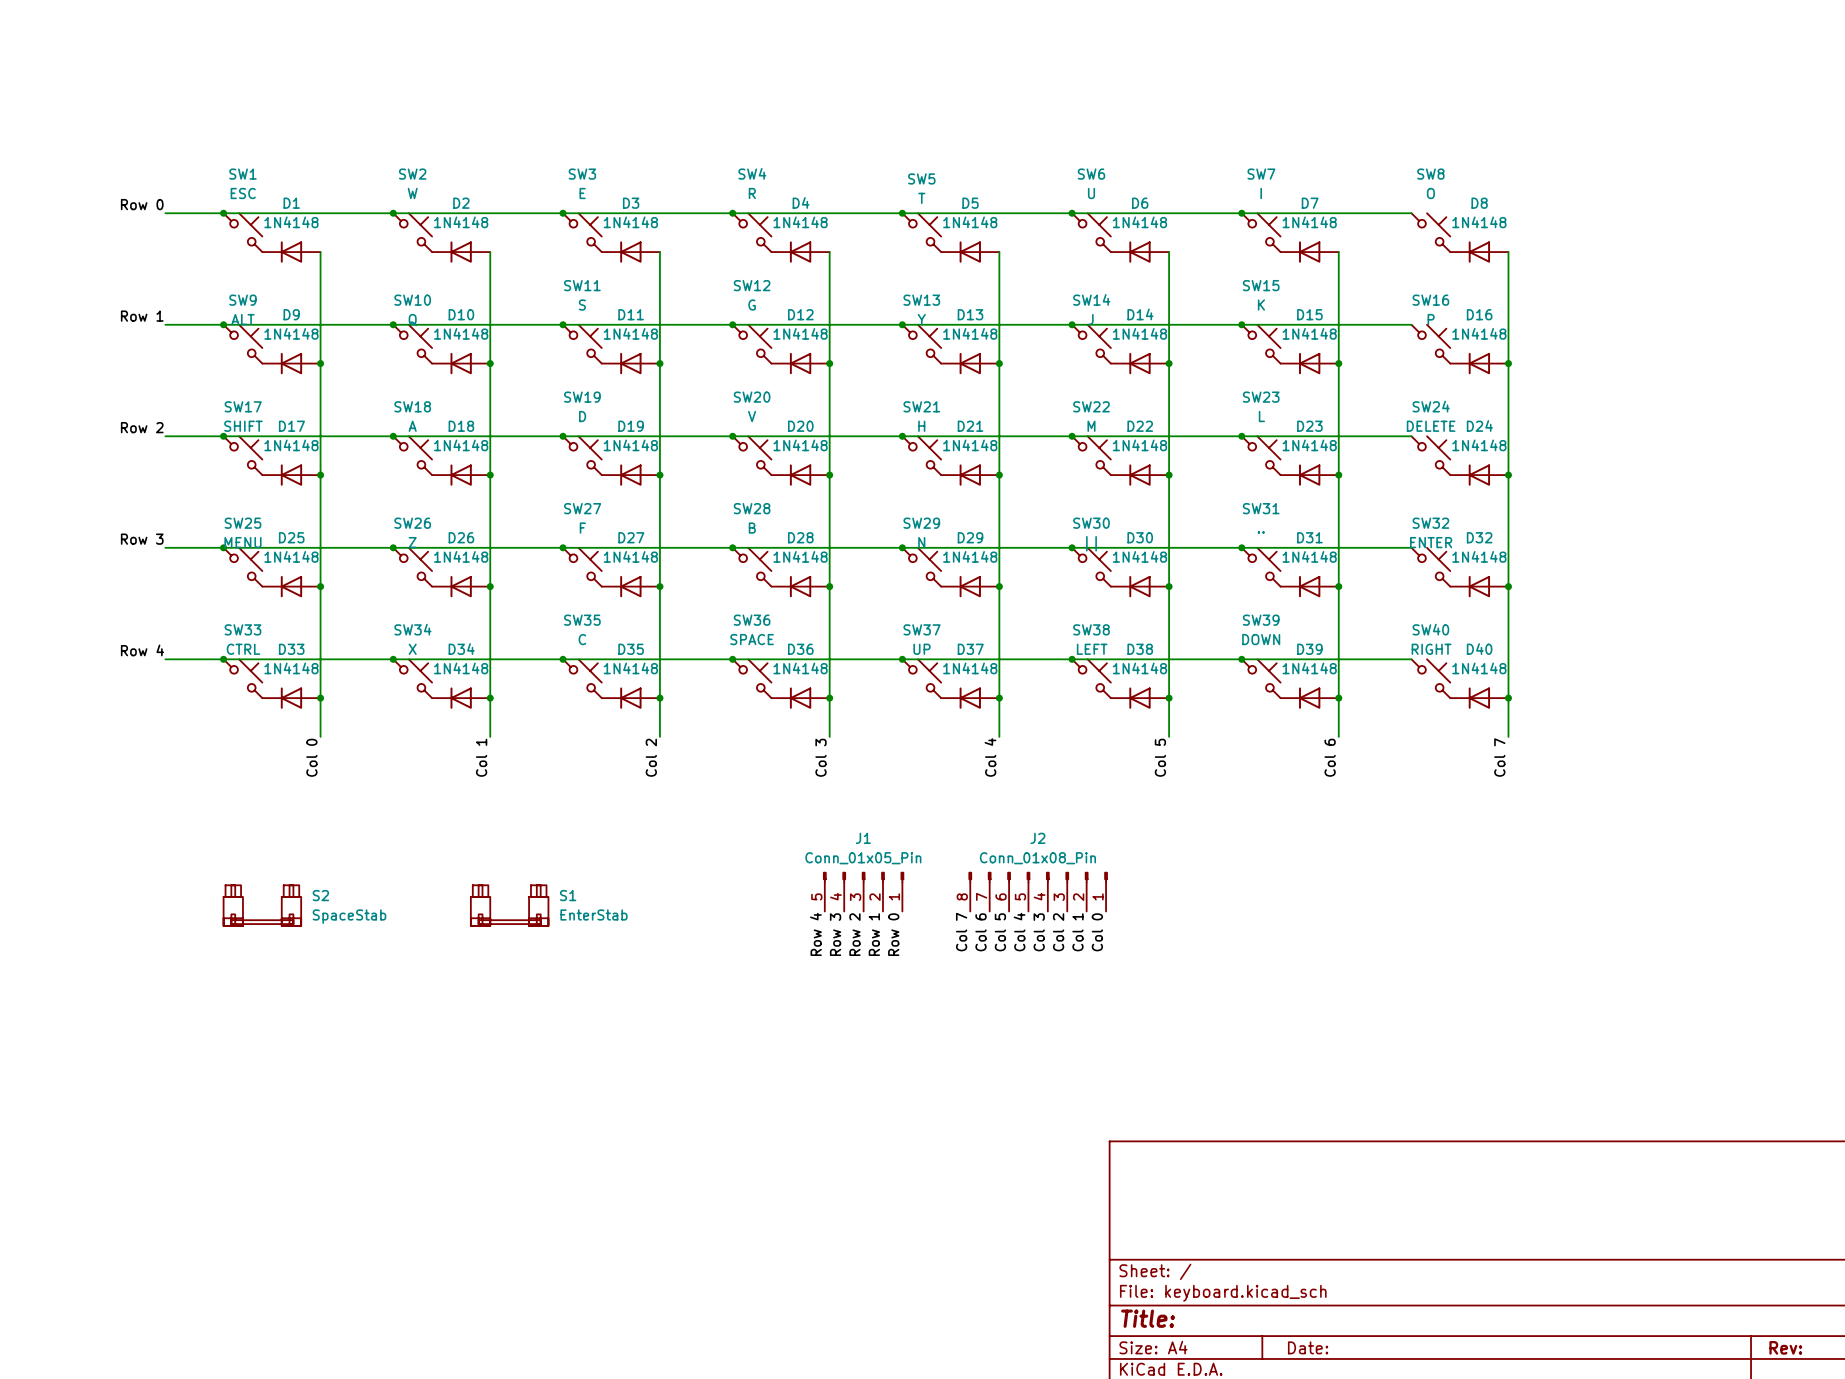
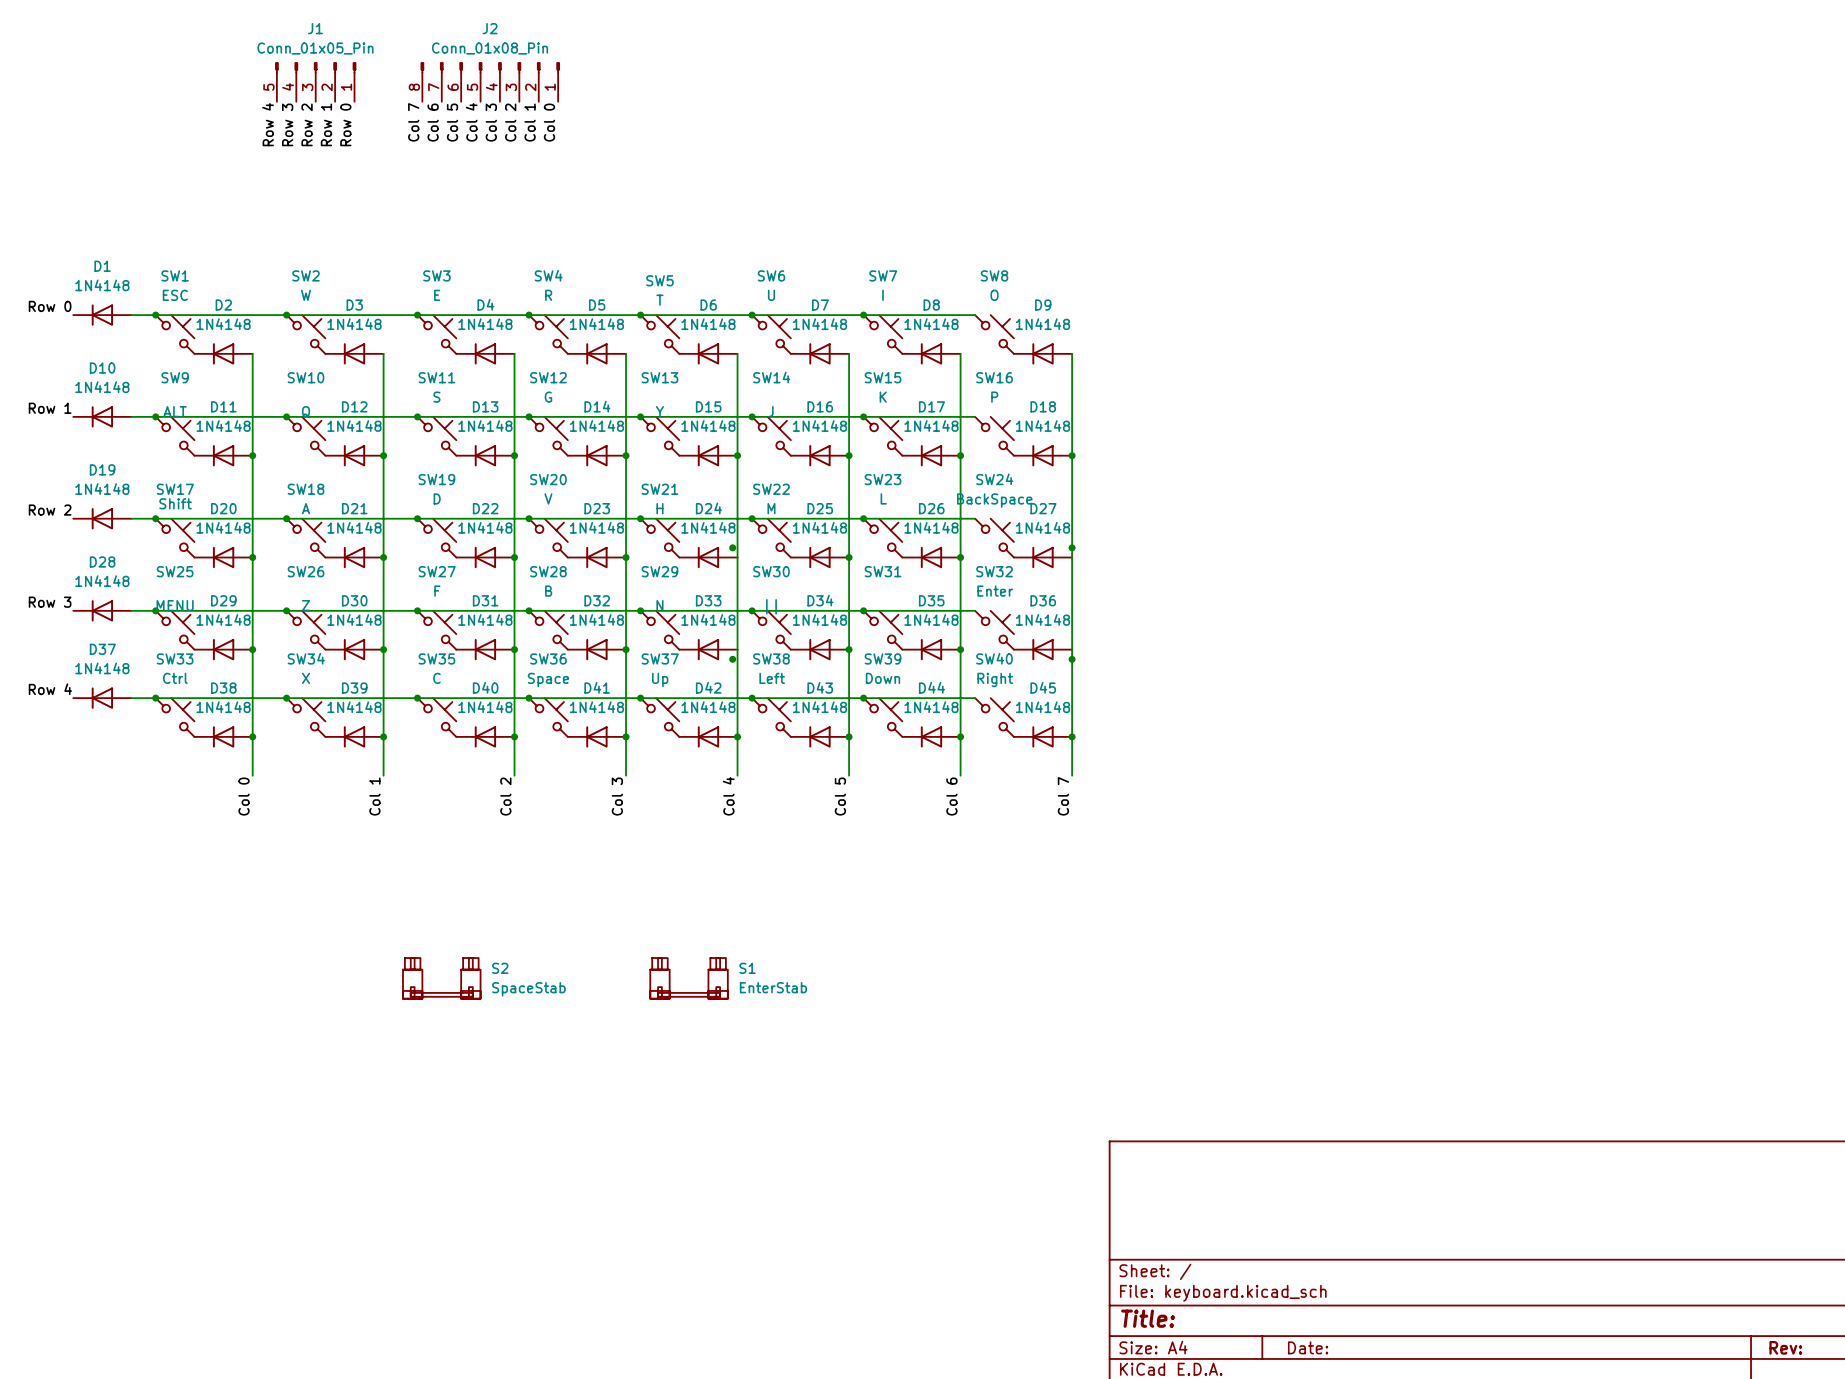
label: none -> Col 7 (413, 122)
label: none -> Col 6 (433, 122)
label: none -> Col 5 (452, 122)
label: none -> Col 4 (471, 122)
label: none -> Col 3 (491, 122)
label: none -> Col 2 (510, 122)
label: none -> Col 1 (530, 122)
label: none -> Col 0 (549, 122)
label: none -> Row 4 (268, 124)
label: none -> Row 3 (287, 124)
label: none -> Row 2 (307, 124)
label: none -> Row 1 (326, 124)
label: none -> Row 0 (345, 124)
label: Row 0 (142, 204) -> none
wire: (165, 213) (1411, 213) -> none
junction: (223, 213) -> none
junction: (393, 213) -> none
junction: (562, 213) -> none
junction: (732, 213) -> none
junction: (902, 213) -> none
junction: (1072, 213) -> none
junction: (1241, 213) -> none
SW1 position: (242, 232) -> (175, 334)
SW2 position: (412, 232) -> (306, 334)
SW3 position: (582, 232) -> (436, 334)
SW4 position: (752, 232) -> (548, 334)
SW5 position: (921, 232) -> (659, 334)
SW6 position: (1091, 232) -> (771, 334)
SW7 position: (1261, 232) -> (883, 334)
SW8 position: (1430, 232) -> (994, 334)
D1 position: (291, 252) -> (102, 315)
wire: (320, 252) (320, 736) -> none
D2 position: (461, 252) -> (223, 353)
wire: (490, 252) (490, 736) -> none
D3 position: (630, 252) -> (354, 353)
wire: (659, 252) (659, 736) -> none
D4 position: (800, 252) -> (485, 353)
wire: (829, 252) (829, 736) -> none
D5 position: (970, 252) -> (596, 353)
wire: (999, 252) (999, 736) -> none
D6 position: (1139, 252) -> (708, 353)
wire: (1169, 252) (1169, 736) -> none
D7 position: (1309, 252) -> (819, 353)
wire: (1338, 252) (1338, 736) -> none
D8 position: (1479, 252) -> (931, 353)
wire: (1508, 252) (1508, 736) -> none
SW14 name position: SW14 (1091, 299) -> SW14 (771, 377)
SW9 name position: SW9 (242, 300) -> SW9 (175, 377)
SW10 name position: SW10 (412, 300) -> SW10 (306, 377)
SW13 name position: SW13 (921, 300) -> SW13 (659, 377)
SW16 name position: SW16 (1430, 300) -> SW16 (994, 377)
label: none -> Row 0 (50, 306)
wire: none -> (131, 315) (975, 315)
junction: none -> (155, 315)
junction: none -> (286, 315)
junction: none -> (529, 315)
junction: none -> (640, 315)
junction: none -> (863, 315)
label position: Row 1 (142, 316) -> Row 1 (50, 408)
SW16 value position: P (1431, 319) -> P (994, 397)
wire: (165, 324) (1411, 324) -> none
junction: (223, 324) -> none
junction position: (393, 324) -> (417, 315)
junction: (562, 324) -> none
junction position: (732, 324) -> (752, 315)
junction: (902, 324) -> none
junction: (1072, 324) -> none
junction: (1241, 324) -> none
SW9 position: (242, 344) -> (175, 436)
SW10 position: (412, 344) -> (306, 436)
SW11 position: (582, 344) -> (436, 436)
SW12 position: (752, 344) -> (548, 436)
SW13 position: (921, 344) -> (659, 436)
SW14 position: (1091, 344) -> (771, 436)
SW15 position: (1261, 344) -> (883, 436)
SW16 position: (1430, 344) -> (994, 436)
wire: none -> (252, 353) (252, 775)
wire: none -> (383, 353) (383, 775)
wire: none -> (514, 353) (514, 775)
wire: none -> (626, 353) (626, 775)
wire: none -> (737, 353) (737, 775)
wire: none -> (849, 353) (849, 775)
wire: none -> (960, 353) (960, 775)
wire: none -> (1072, 353) (1072, 775)
D9 position: (291, 363) -> (1043, 353)
junction: (320, 363) -> none
D10 position: (461, 363) -> (102, 416)
junction: (490, 363) -> none
D11 position: (630, 363) -> (223, 455)
junction: (659, 363) -> none
D12 position: (800, 363) -> (354, 455)
junction: (829, 363) -> none
D13 position: (970, 363) -> (485, 455)
junction: (999, 363) -> none
D14 position: (1139, 363) -> (596, 455)
junction: (1169, 363) -> none
D15 position: (1309, 363) -> (708, 455)
junction: (1338, 363) -> none
D16 position: (1479, 363) -> (819, 455)
junction: (1508, 363) -> none
SW24 name position: SW24 (1431, 406) -> SW24 (994, 479)
wire: none -> (131, 416) (975, 416)
junction: none -> (155, 416)
junction: none -> (286, 416)
junction: none -> (417, 416)
junction: none -> (529, 416)
junction: none -> (640, 416)
junction: none -> (752, 416)
junction: none -> (863, 416)
SW17 value: SHIFT (243, 426) -> Shift (175, 503)
SW24 value: DELETE (1431, 426) -> BackSpace (994, 500)
label position: Row 2 (142, 427) -> Row 2 (50, 510)
wire: (165, 436) (1411, 436) -> none
junction: (223, 436) -> none
junction: (393, 436) -> none
junction: (562, 436) -> none
junction: (732, 436) -> none
junction: (902, 436) -> none
junction position: (1072, 436) -> (1072, 455)
junction: (1241, 436) -> none
SW17 position: (242, 455) -> (175, 538)
junction: none -> (252, 455)
junction: none -> (383, 455)
SW18 position: (412, 455) -> (306, 538)
junction: none -> (514, 455)
SW19 position: (582, 455) -> (436, 538)
junction: none -> (626, 455)
junction: none -> (737, 455)
SW20 position: (752, 455) -> (548, 538)
SW21 position: (921, 455) -> (659, 538)
junction: none -> (960, 455)
SW22 position: (1091, 455) -> (771, 538)
SW23 position: (1261, 455) -> (883, 538)
SW24 position: (1430, 455) -> (994, 538)
D17 position: (291, 475) -> (931, 455)
junction: (320, 475) -> none
D18 position: (461, 475) -> (1043, 455)
junction: (490, 475) -> none
D19 position: (630, 475) -> (102, 518)
junction: (659, 475) -> none
D20 position: (800, 475) -> (223, 557)
junction position: (829, 475) -> (849, 455)
D21 position: (970, 475) -> (354, 557)
junction: (999, 475) -> none
D22 position: (1139, 475) -> (485, 557)
junction: (1169, 475) -> none
D23 position: (1309, 475) -> (596, 557)
junction: (1338, 475) -> none
D24 position: (1479, 475) -> (708, 557)
junction: (1508, 475) -> none
wire: none -> (131, 518) (975, 518)
junction: none -> (155, 518)
junction: none -> (286, 518)
junction: none -> (417, 518)
junction: none -> (529, 518)
junction: none -> (640, 518)
junction: none -> (752, 518)
junction: none -> (863, 518)
SW25 name position: SW25 (242, 523) -> SW25 (175, 571)
SW26 name position: SW26 (412, 523) -> SW26 (306, 571)
SW29 name position: SW29 (921, 523) -> SW29 (659, 571)
SW30 name position: SW30 (1091, 523) -> SW30 (771, 571)
SW32 name position: SW32 (1430, 523) -> SW32 (994, 571)
SW31 value: .. (1261, 532) -> none
label position: Row 3 (142, 539) -> Row 3 (50, 602)
SW32 value: ENTER (1431, 542) -> Enter (995, 591)
wire: (165, 547) (1411, 547) -> none
junction position: (223, 547) -> (252, 557)
junction position: (393, 547) -> (383, 557)
junction: (562, 547) -> none
junction: (902, 547) -> none
junction: (1241, 547) -> none
junction: none -> (514, 557)
junction: none -> (626, 557)
junction: none -> (849, 557)
junction: none -> (960, 557)
SW25 position: (242, 567) -> (175, 630)
SW26 position: (412, 567) -> (306, 630)
SW27 position: (582, 567) -> (436, 630)
SW28 position: (752, 567) -> (548, 630)
SW29 position: (921, 567) -> (659, 630)
SW30 position: (1091, 567) -> (771, 630)
SW31 position: (1261, 567) -> (883, 630)
SW32 position: (1430, 567) -> (994, 630)
D25 position: (291, 586) -> (819, 557)
junction: (320, 586) -> none
D26 position: (461, 586) -> (931, 557)
junction: (490, 586) -> none
D27 position: (630, 586) -> (1043, 557)
junction: (659, 586) -> none
D28 position: (800, 586) -> (102, 610)
junction: (829, 586) -> none
D29 position: (970, 586) -> (223, 649)
junction: (999, 586) -> none
D30 position: (1139, 586) -> (354, 649)
junction: (1169, 586) -> none
D31 position: (1309, 586) -> (485, 649)
junction: (1338, 586) -> none
D32 position: (1479, 586) -> (596, 649)
junction: (1508, 586) -> none
wire: none -> (131, 610) (975, 610)
junction: none -> (155, 610)
junction: none -> (286, 610)
junction: none -> (417, 610)
junction: none -> (529, 610)
junction: none -> (640, 610)
junction: none -> (752, 610)
junction: none -> (863, 610)
SW33 name position: SW33 (242, 629) -> SW33 (175, 658)
SW34 name position: SW34 (412, 629) -> SW34 (306, 658)
SW37 name position: SW37 (922, 629) -> SW37 (660, 658)
SW38 name position: SW38 (1091, 629) -> SW38 (771, 658)
SW40 name position: SW40 (1430, 629) -> SW40 (994, 658)
SW36 value: SPACE (752, 639) -> Space (548, 679)
SW39 value: DOWN (1261, 639) -> Down (883, 678)
SW33 value: CTRL (243, 649) -> Ctrl (175, 678)
SW34 value position: X (412, 649) -> X (306, 678)
junction: none -> (514, 649)
junction: none -> (626, 649)
junction: none -> (849, 649)
SW37 value: UP (922, 649) -> Up (660, 679)
junction: none -> (960, 649)
SW38 value: LEFT (1092, 649) -> Left (772, 678)
SW40 value: RIGHT (1431, 649) -> Right (995, 679)
label position: Row 4 (142, 650) -> Row 4 (50, 689)
wire: (165, 659) (1411, 659) -> none
junction position: (223, 659) -> (252, 649)
junction position: (393, 659) -> (383, 649)
junction: (562, 659) -> none
junction: (902, 659) -> none
junction: (1241, 659) -> none
SW33 position: (242, 678) -> (175, 717)
SW34 position: (412, 678) -> (306, 717)
SW35 position: (582, 678) -> (436, 717)
SW36 position: (752, 678) -> (548, 717)
SW37 position: (921, 678) -> (659, 717)
SW38 position: (1091, 678) -> (771, 717)
SW39 position: (1261, 678) -> (883, 717)
SW40 position: (1430, 678) -> (994, 717)
wire: none -> (131, 698) (975, 698)
junction: none -> (155, 698)
D33 position: (291, 698) -> (708, 649)
junction position: (320, 698) -> (286, 698)
junction: none -> (417, 698)
D34 position: (461, 698) -> (819, 649)
junction: (490, 698) -> none
junction: none -> (529, 698)
D35 position: (630, 698) -> (931, 649)
junction position: (659, 698) -> (640, 698)
junction: none -> (752, 698)
D36 position: (800, 698) -> (1043, 649)
junction: (829, 698) -> none
junction: none -> (863, 698)
D37 position: (970, 698) -> (102, 698)
junction: (999, 698) -> none
D38 position: (1139, 698) -> (223, 736)
junction: (1169, 698) -> none
D39 position: (1309, 698) -> (354, 736)
junction: (1338, 698) -> none
D40 position: (1479, 698) -> (485, 736)
junction: (1508, 698) -> none
junction: none -> (252, 736)
junction: none -> (383, 736)
junction: none -> (514, 736)
D41: none -> 1N4148 (596, 736)
junction: none -> (626, 736)
D42: none -> 1N4148 (708, 736)
junction: none -> (737, 736)
D43: none -> 1N4148 (819, 736)
junction: none -> (849, 736)
D44: none -> 1N4148 (931, 736)
junction: none -> (960, 736)
D45: none -> 1N4148 (1043, 736)
junction: none -> (1072, 736)
label position: Col 0 (311, 757) -> Col 0 (244, 796)
label position: Col 1 (481, 757) -> Col 1 (374, 796)
label position: Col 2 (651, 757) -> Col 2 (505, 796)
label: Col 3 (821, 757) -> Col 5 (840, 796)
label: Col 4 (990, 757) -> none
label: Col 5 (1160, 757) -> none
label: Col 6 (1330, 757) -> none
label: Col 7 (1499, 757) -> none
label: none -> Col 3 (617, 796)
label: none -> Col 4 (728, 796)
J1 position: (863, 891) -> (315, 82)
J2 position: (1038, 891) -> (490, 82)
S2 position: (262, 905) -> (441, 978)
S1 position: (509, 905) -> (689, 978)
label position: Col 7 (961, 932) -> Col 7 (1063, 796)
label position: Col 6 (981, 932) -> Col 6 (951, 796)
label: Col 5 (1000, 932) -> none
label: Col 4 (1019, 932) -> none
label: Col 3 (1039, 932) -> none
label: Col 2 (1058, 932) -> none
label: Col 1 (1077, 932) -> none
label: Col 0 (1097, 932) -> none
label: Row 4 (815, 934) -> none
label: Row 3 (835, 934) -> none
label: Row 2 (854, 934) -> none
label: Row 1 (874, 934) -> none
label: Row 0 (893, 934) -> none

